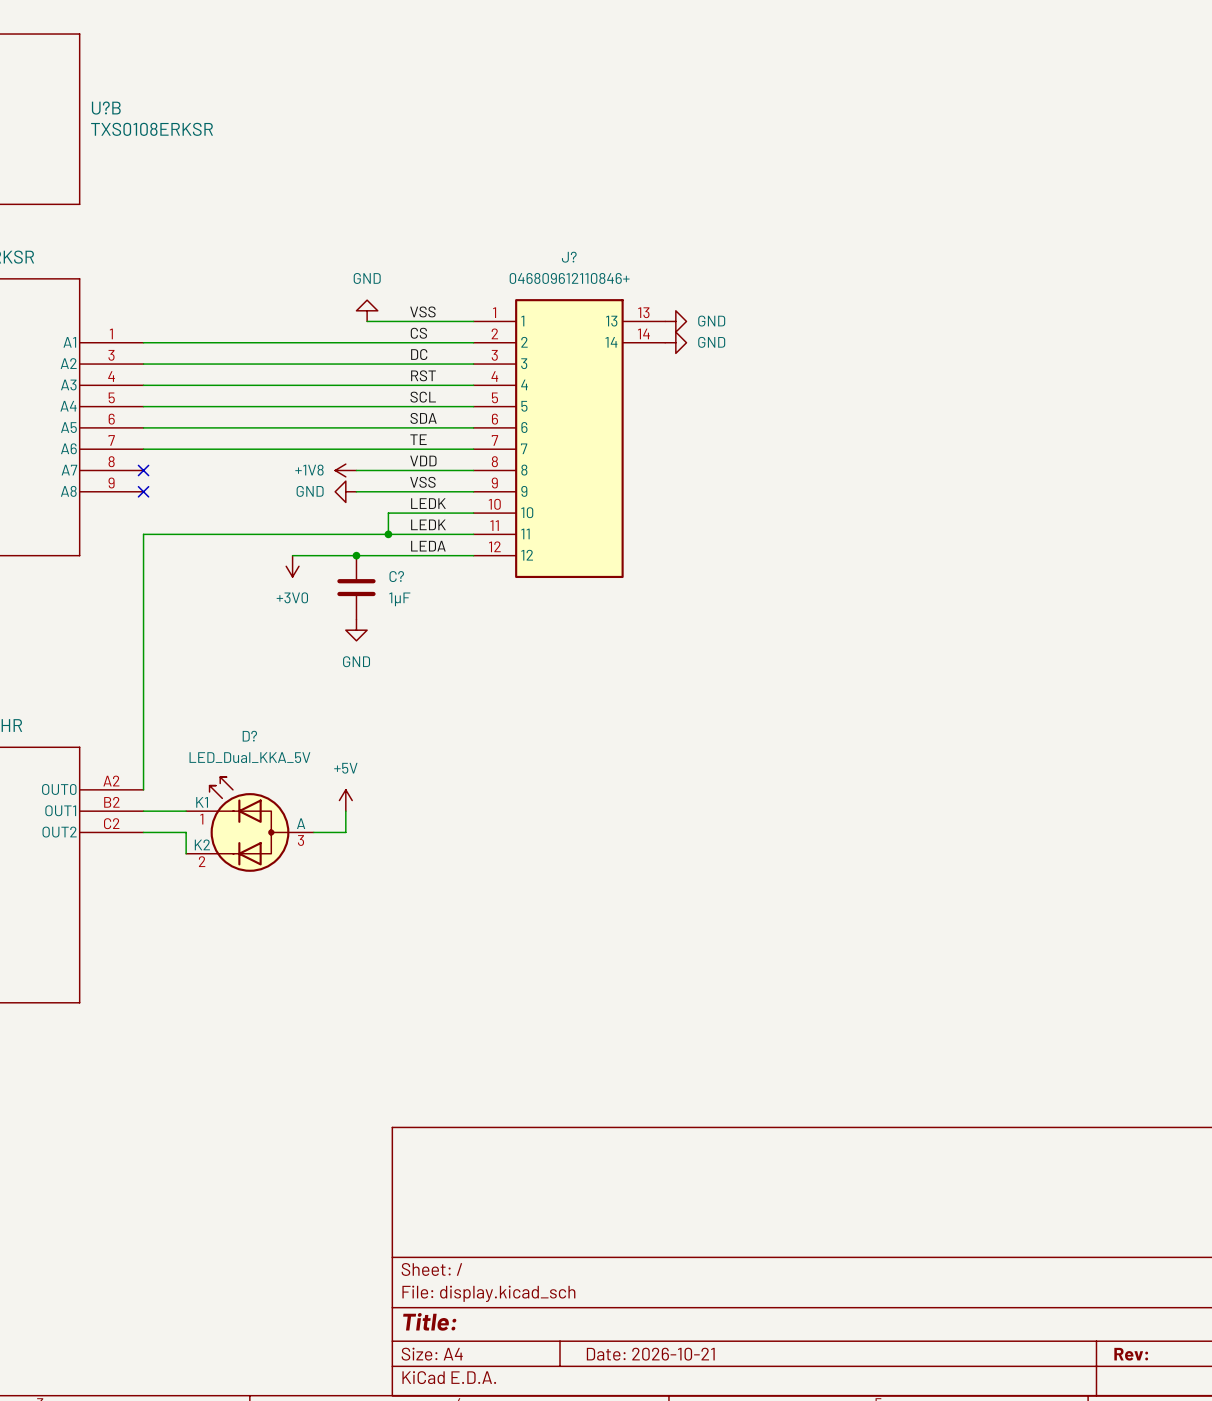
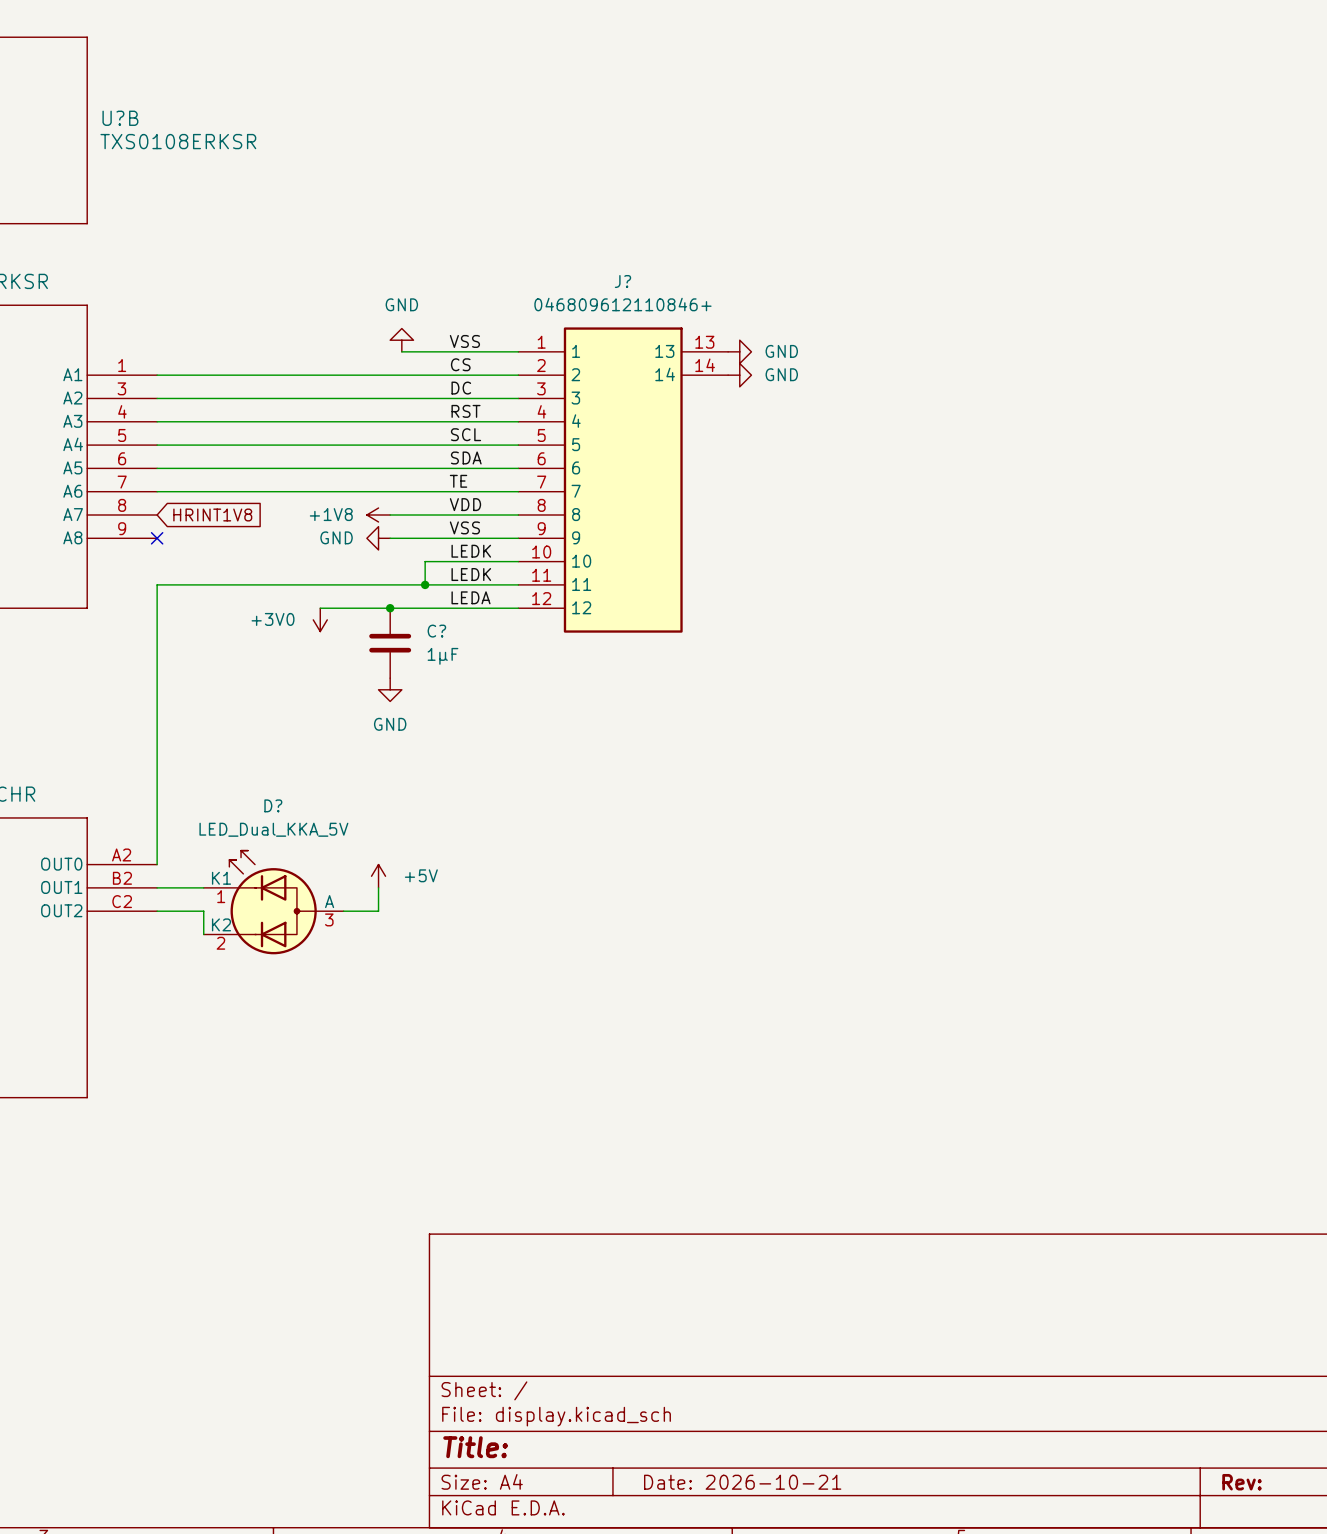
no-connect mark: (143, 470) -> none
global label: none -> HRINT1V8 (212, 515)
power symbol text position: +3V0 (292, 597) -> +3V0 (273, 619)
power symbol text position: +5V (345, 768) -> +5V (421, 875)

